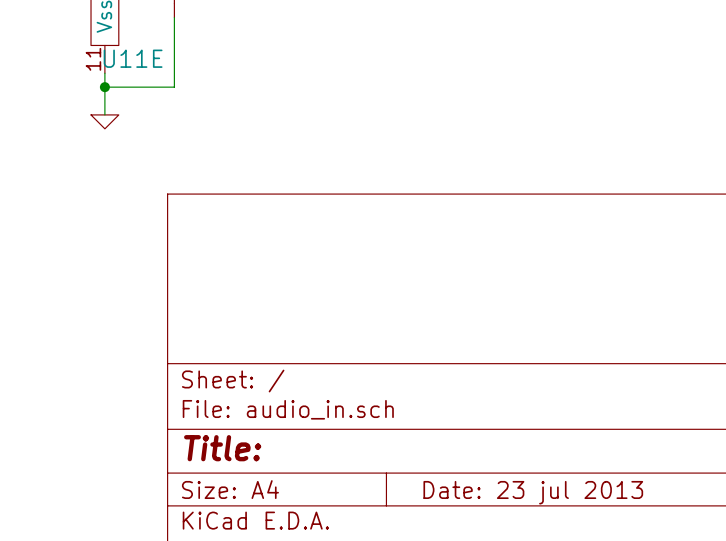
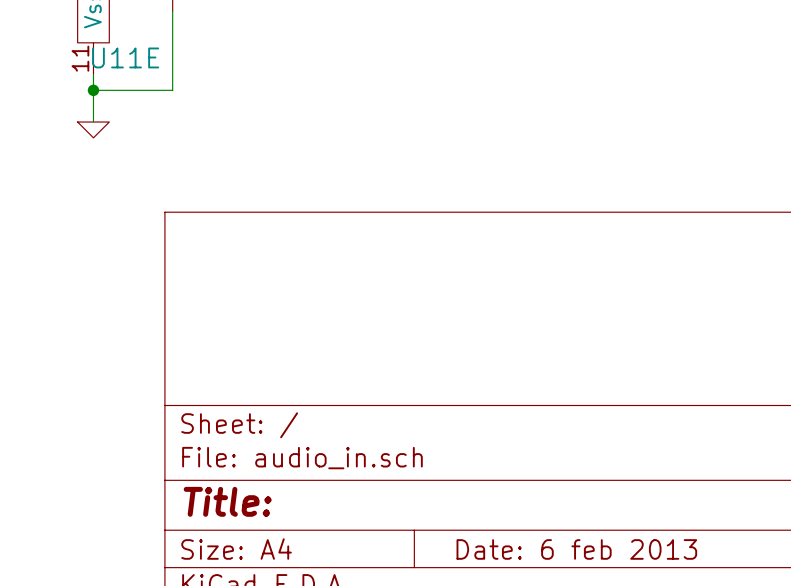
title block: Date: 23 jul 2013 (533, 492) -> Date: 6 feb 2013 (576, 549)

